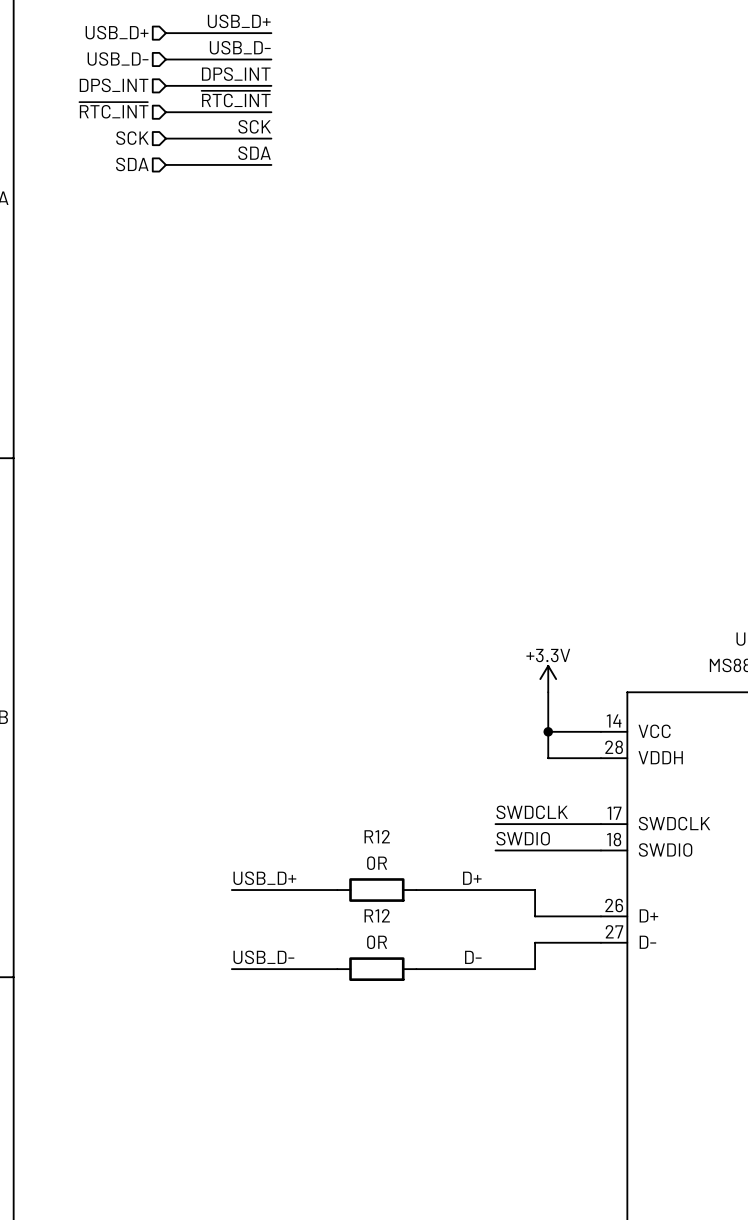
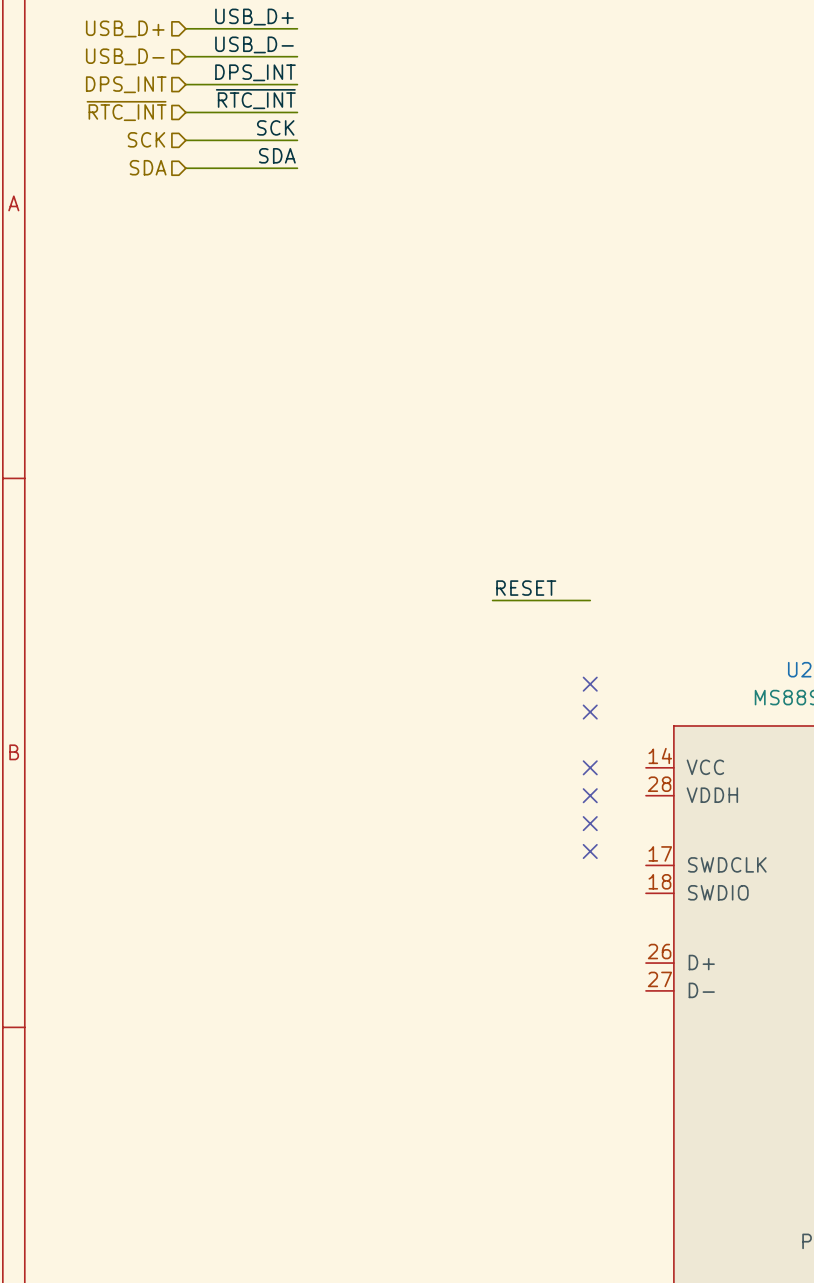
label: none -> RESET (526, 588)
wire: none -> (492, 600) (590, 600)
no-connect mark: none -> (590, 684)
no-connect mark: none -> (590, 712)
power symbol: +3.3V (548, 679) -> none
wire: (548, 692) (548, 758) (600, 758) -> none
wire: (548, 731) (600, 731) -> none
junction: (548, 731) -> none
no-connect mark: none -> (590, 767)
no-connect mark: none -> (590, 795)
no-connect mark: none -> (590, 823)
no-connect mark: none -> (590, 851)
label: SWDCLK (532, 812) -> none
wire: (495, 824) (600, 824) -> none
label: SWDIO (523, 838) -> none
wire: (495, 850) (600, 850) -> none
label: USB_D+ (264, 878) -> none
label: D+ (472, 878) -> none
wire: (231, 890) (337, 890) -> none
R12: 0R (376, 890) -> none
wire: (416, 890) (535, 890) (535, 916) (600, 916) -> none
wire: (600, 942) (535, 942) (535, 969) (416, 969) -> none
label: USB_D- (263, 957) -> none
label: D- (473, 957) -> none
wire: (231, 969) (337, 969) -> none
R12: 0R (376, 969) -> none

